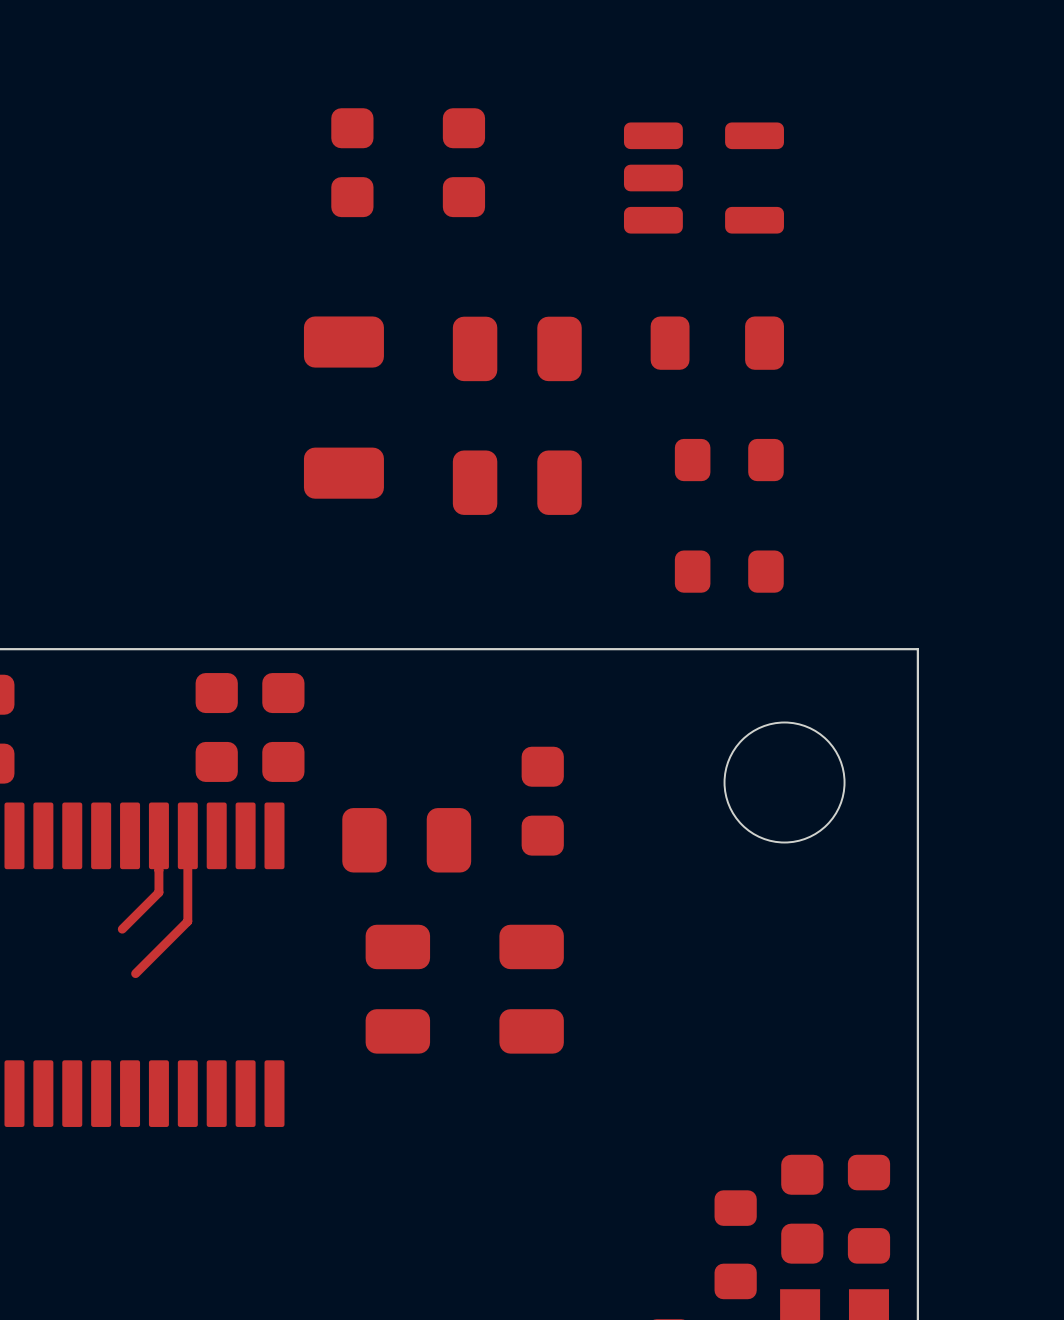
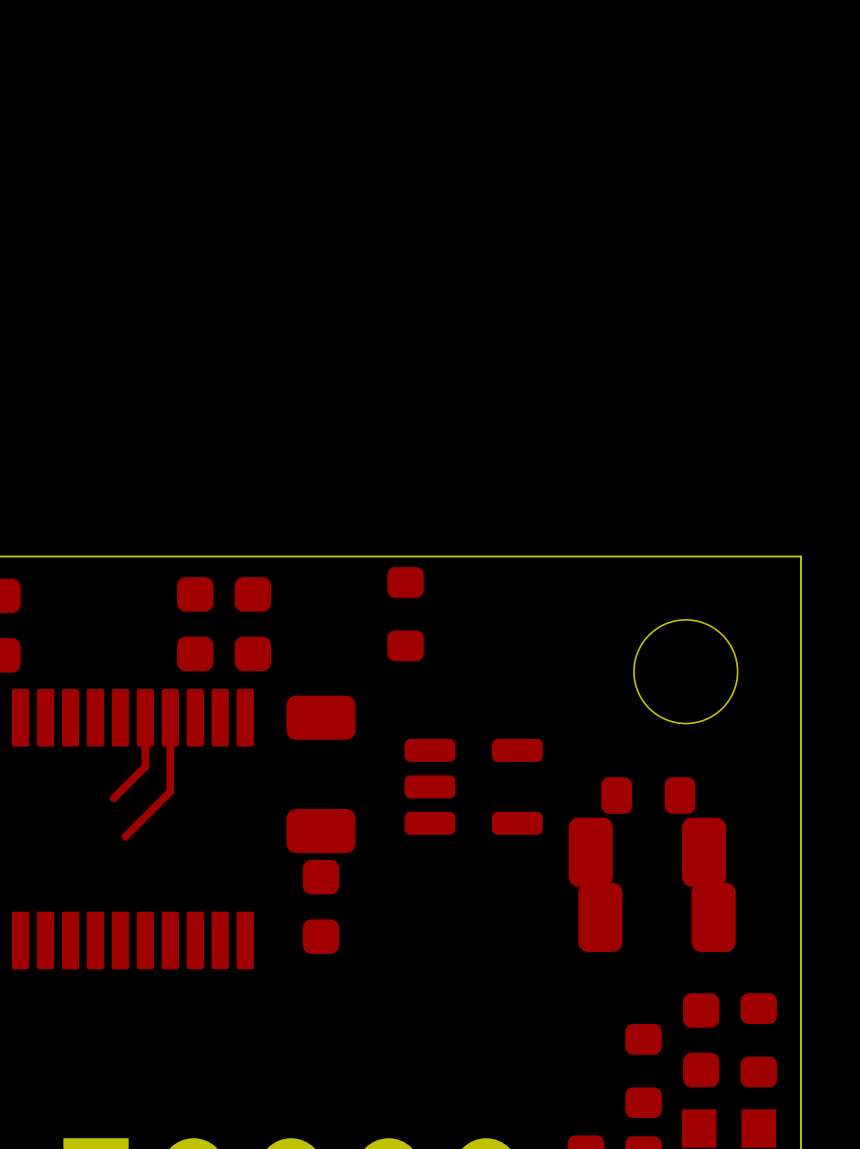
part: (352, 162) -> none
part: (463, 162) -> none
part position: (703, 178) -> (473, 786)
part: (717, 343) -> none
part: (517, 348) -> none
part: (343, 407) -> none
part: (729, 460) -> none
part: (517, 482) -> none
part: (729, 571) -> none
part: none -> (405, 614)
part position: (542, 801) -> (321, 906)
part: (406, 840) -> none
part: none -> (321, 774)
part: none -> (648, 795)
part: (397, 989) -> none
part: (531, 989) -> none
part: none -> (647, 852)
part: none -> (656, 917)

